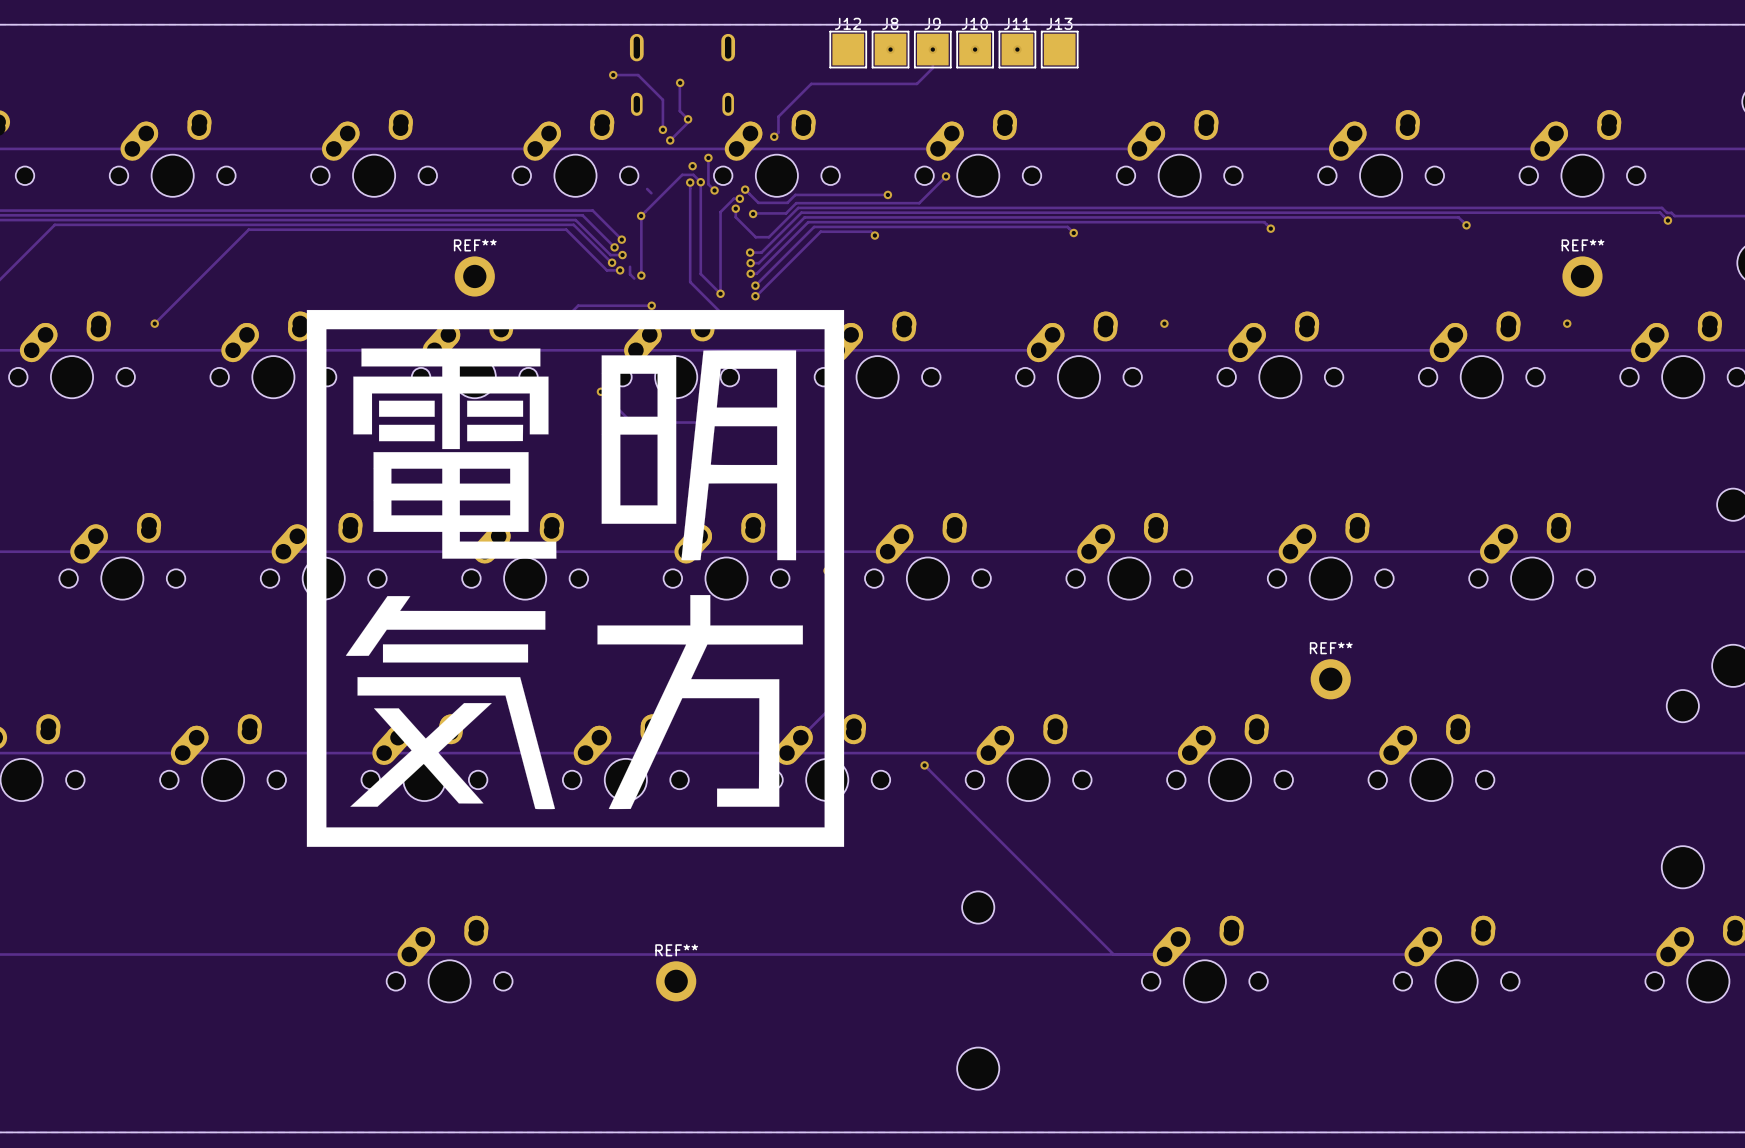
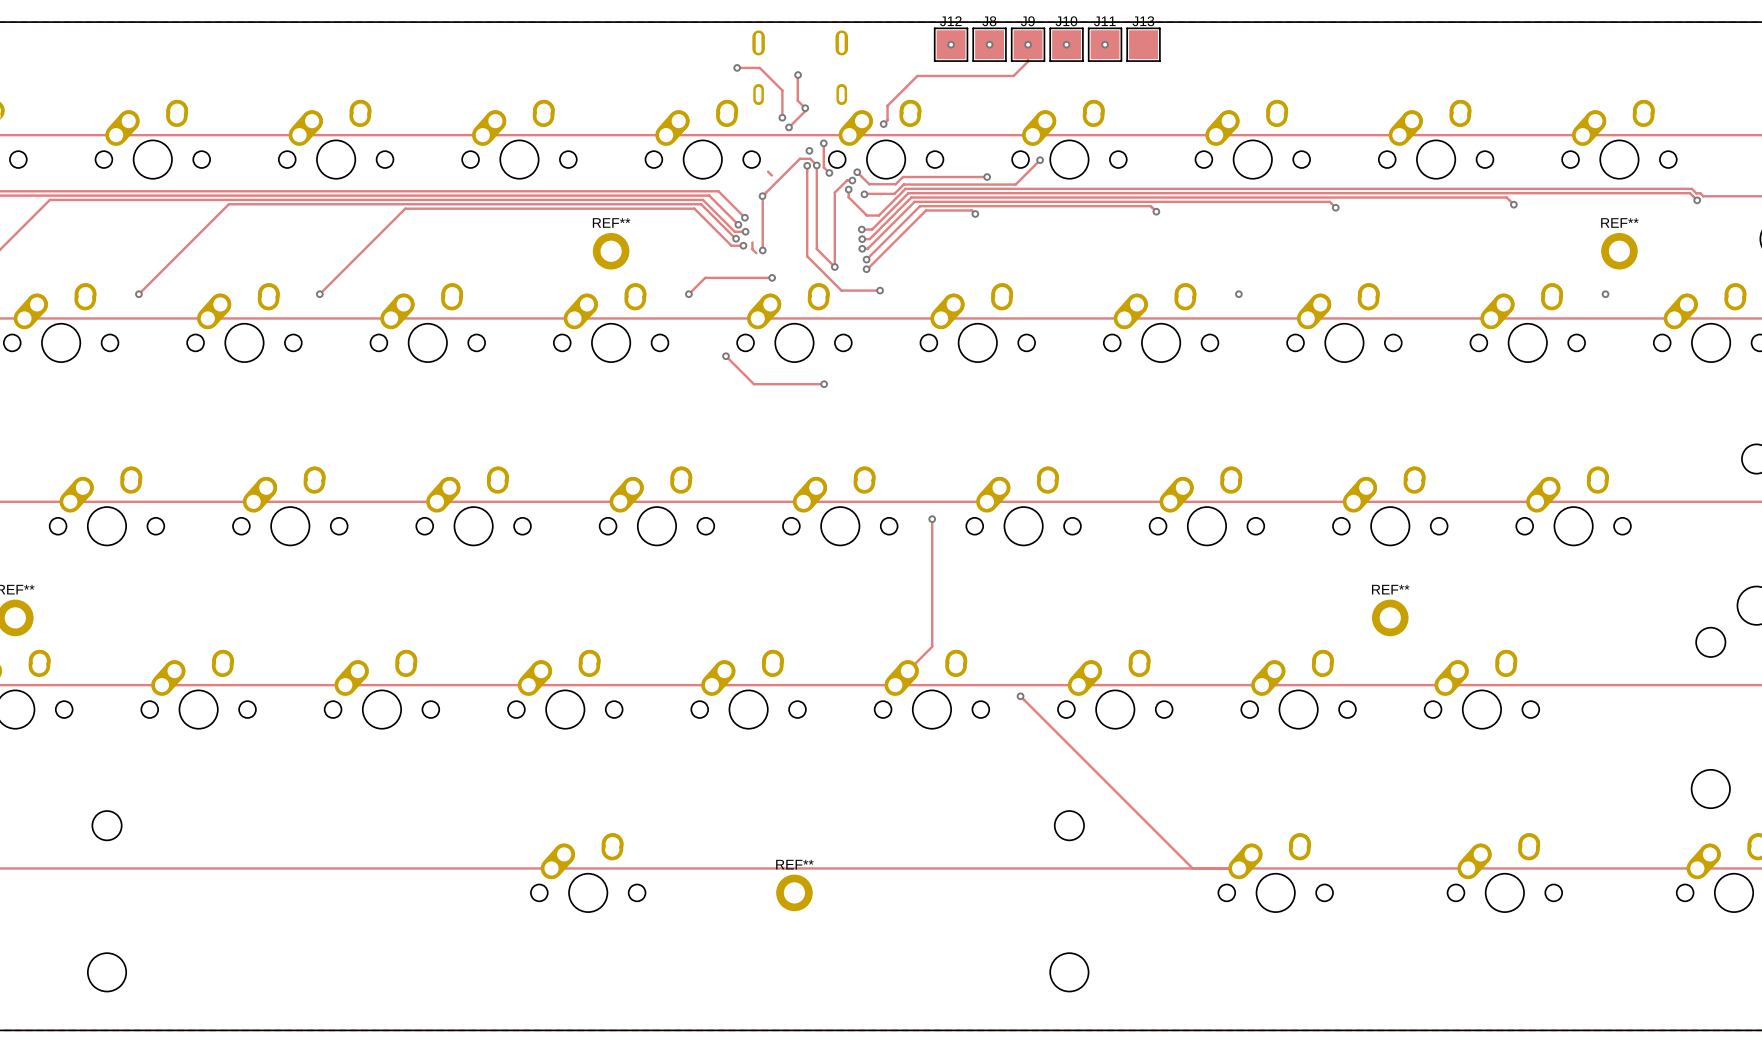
via: none -> (951, 44)
drawing: [306, 309, 845, 847] -> none

